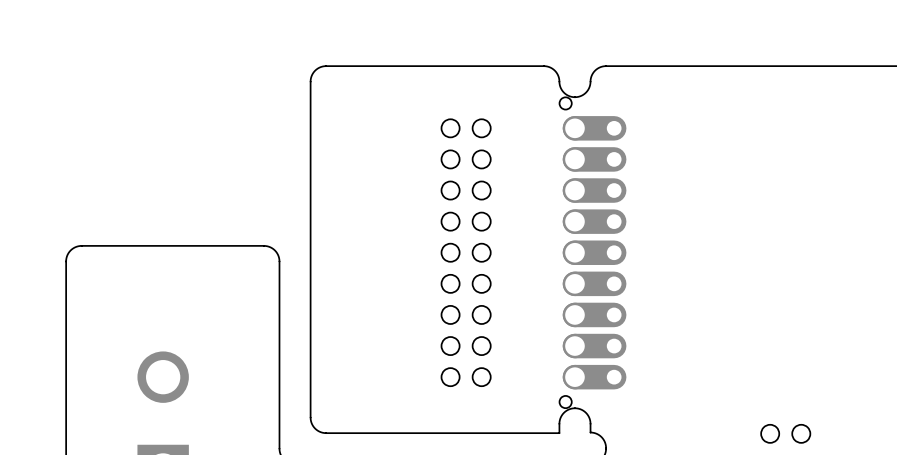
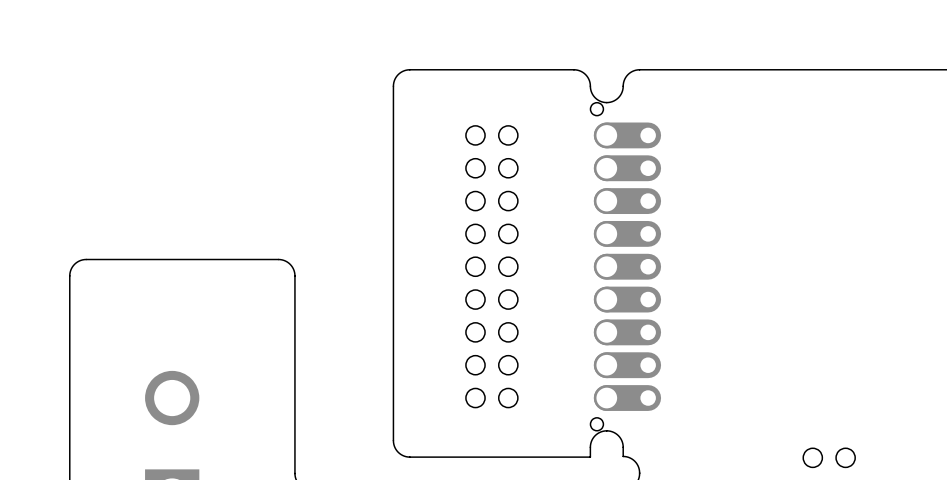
board edge: (388, 66) (322, 66) (313, 71) (310, 81) (310, 421) (316, 429) (324, 433) (388, 433) -> (409, 69) (398, 74) (393, 86) (393, 440) (398, 452) (409, 457)

